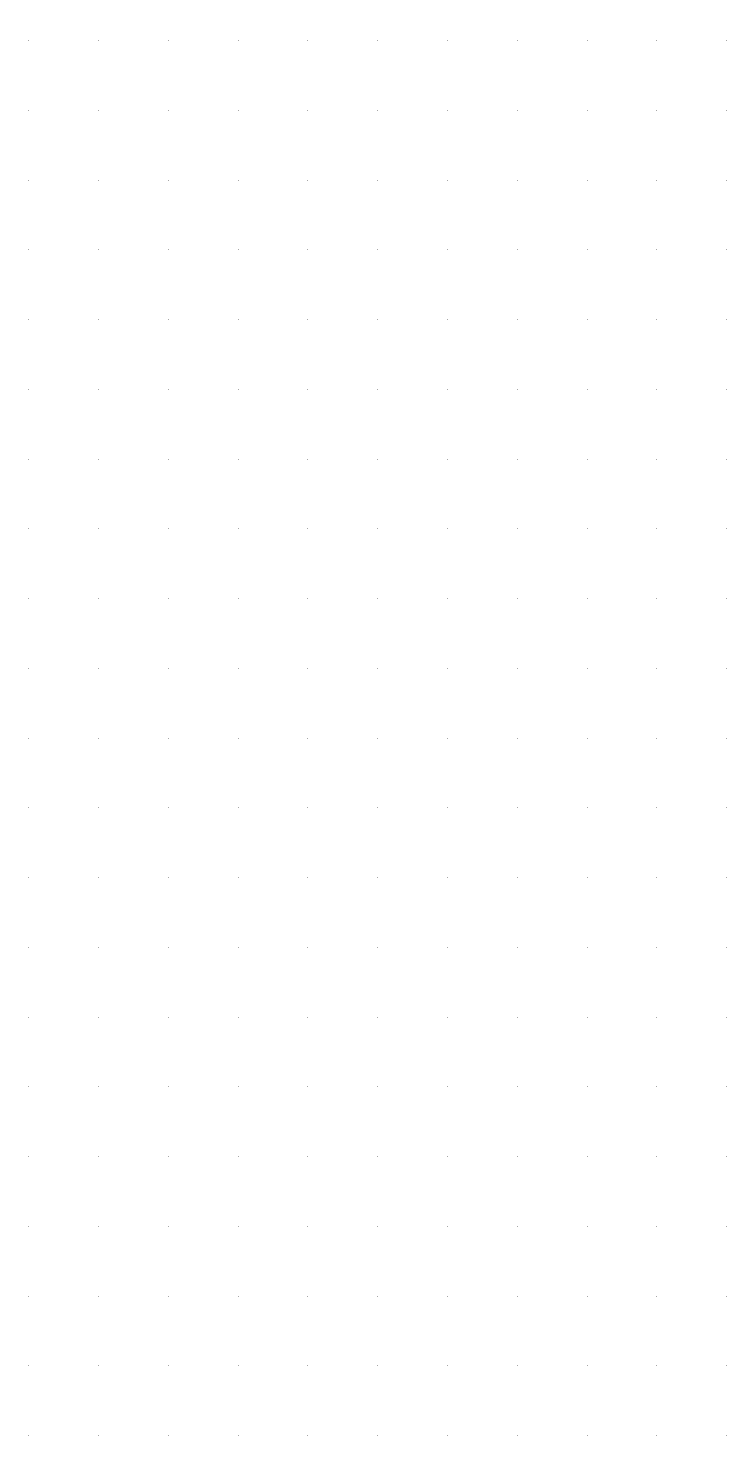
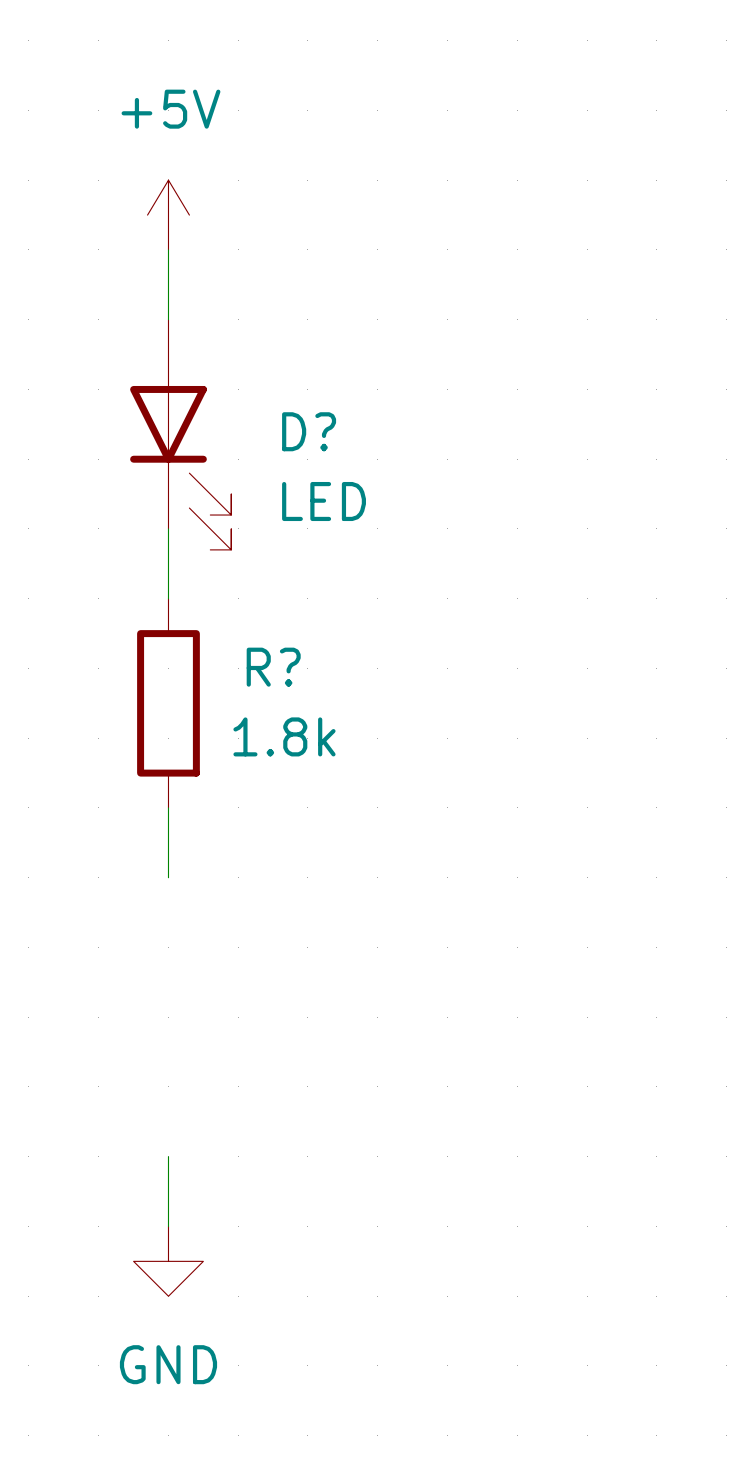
power symbol: none -> +5V (168, 215)
wire: none -> (168, 249) (168, 319)
D?: none -> LED (180, 434)
wire: none -> (168, 528) (168, 598)
R?: none -> 1.8k (168, 703)
wire: none -> (168, 807) (168, 877)
wire: none -> (168, 1156) (168, 1226)
power symbol: none -> GND (168, 1261)

